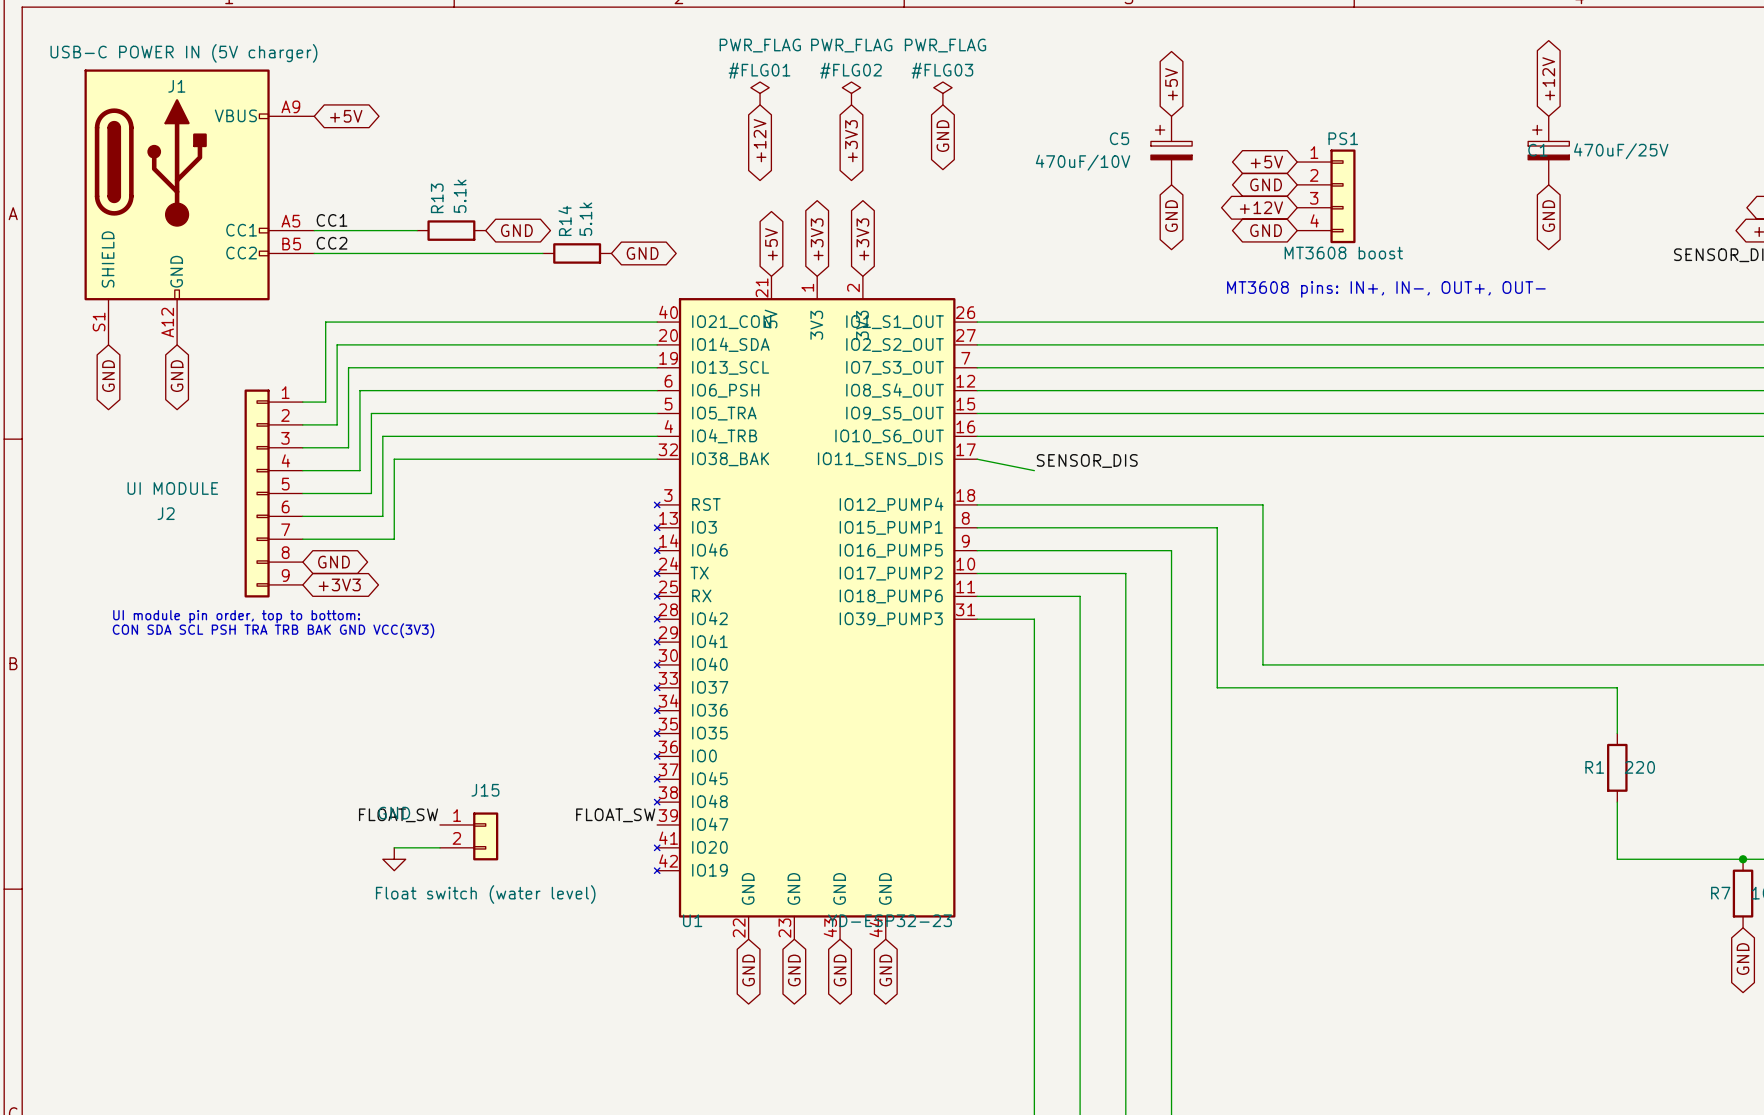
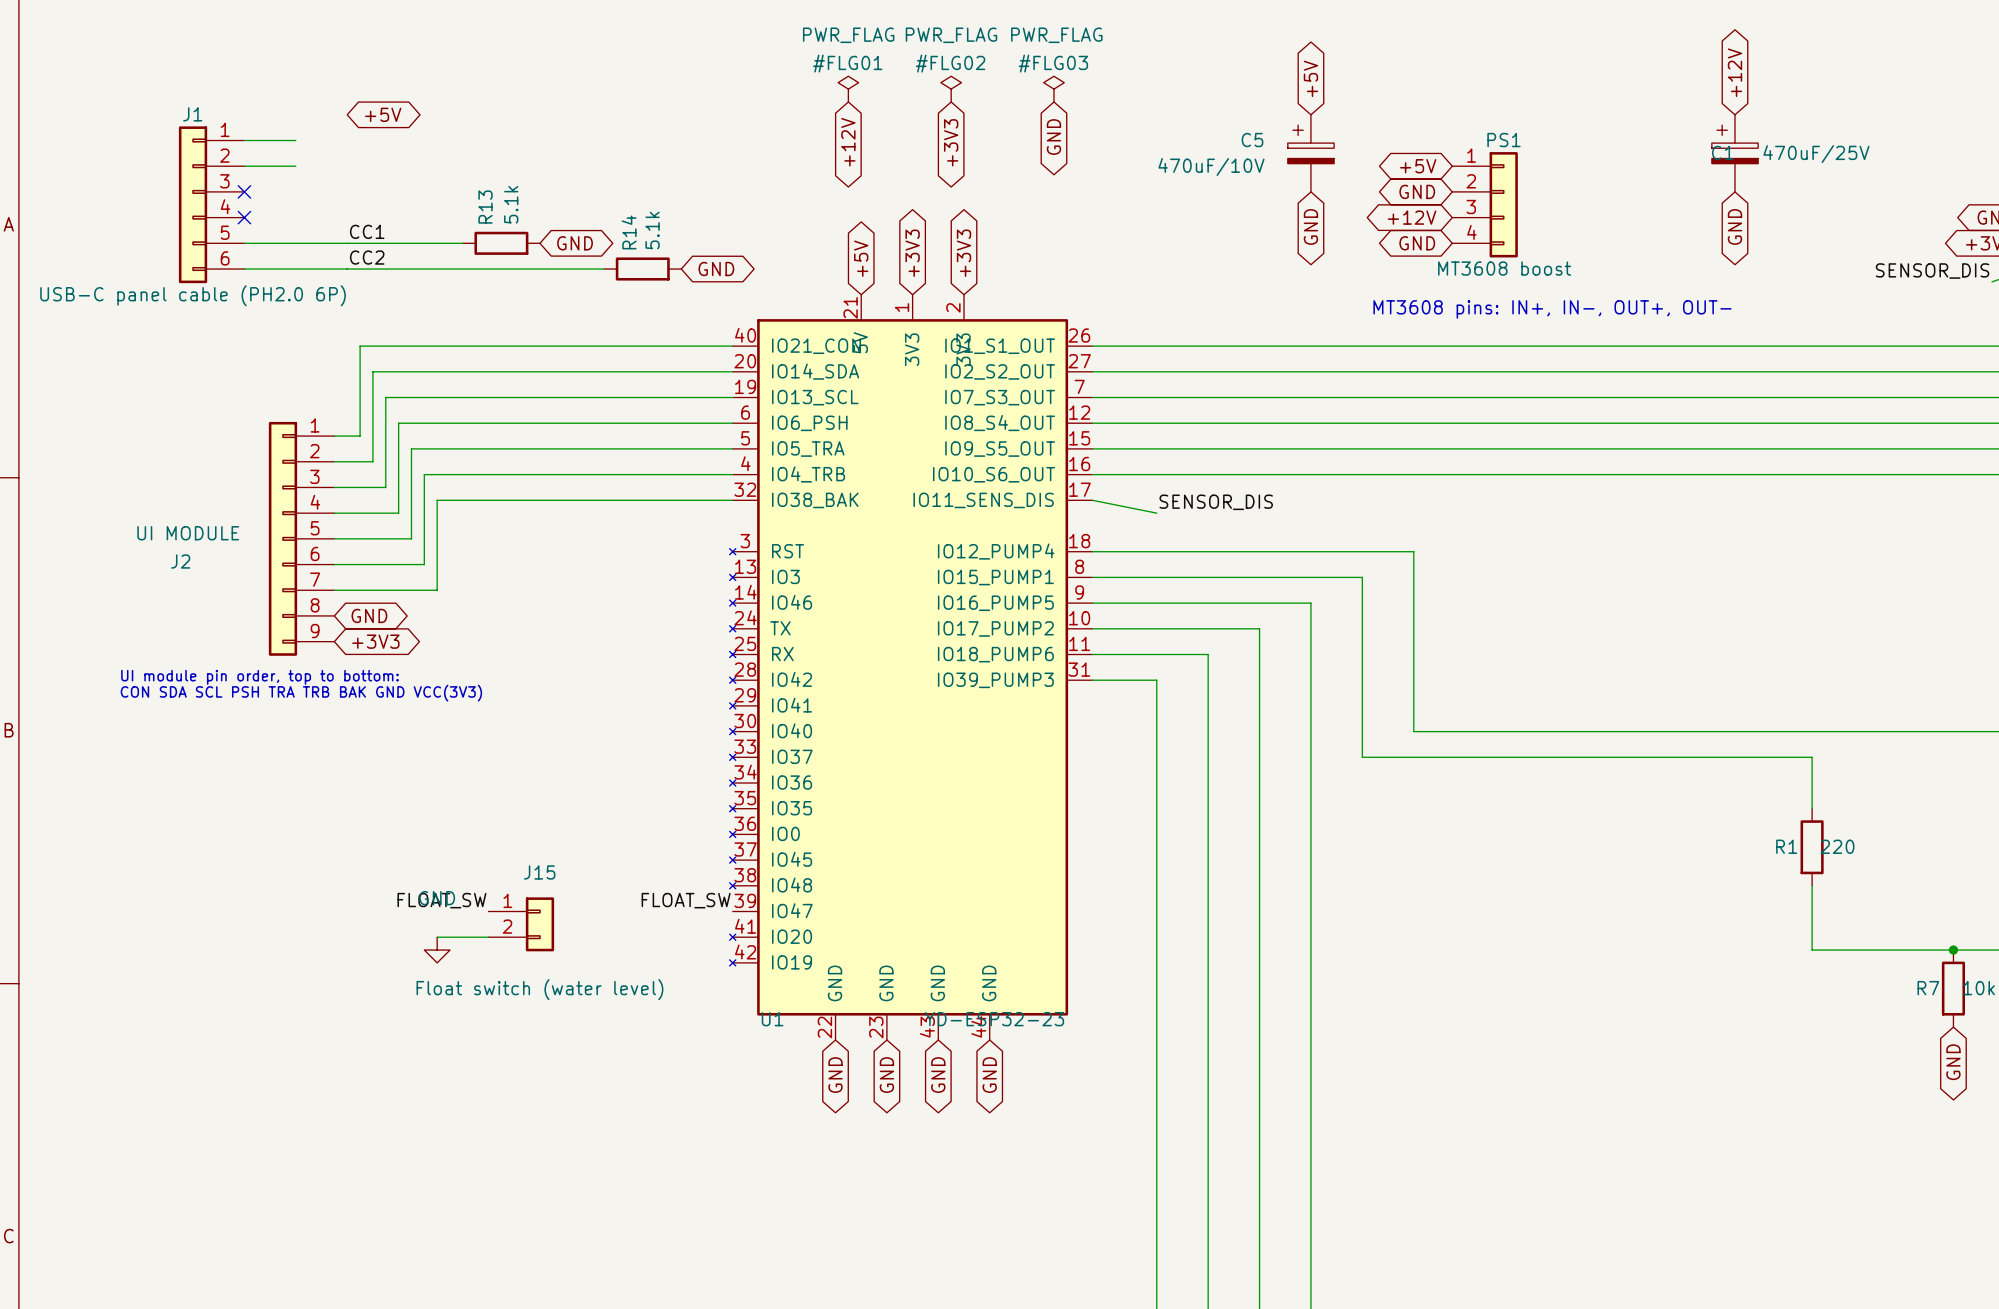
J1 value: USB-C POWER IN (5V charger) (183, 53) -> USB-C panel cable (PH2.0 6P) (193, 295)
J1 symbol: [84, 69, 315, 345] -> [178, 126, 245, 284]
J1 name position: J1 (176, 86) -> J1 (192, 114)
no-connect mark: none -> (244, 191)
no-connect mark: none -> (244, 217)
global label: GND (108, 376) -> none
global label: GND (177, 376) -> none

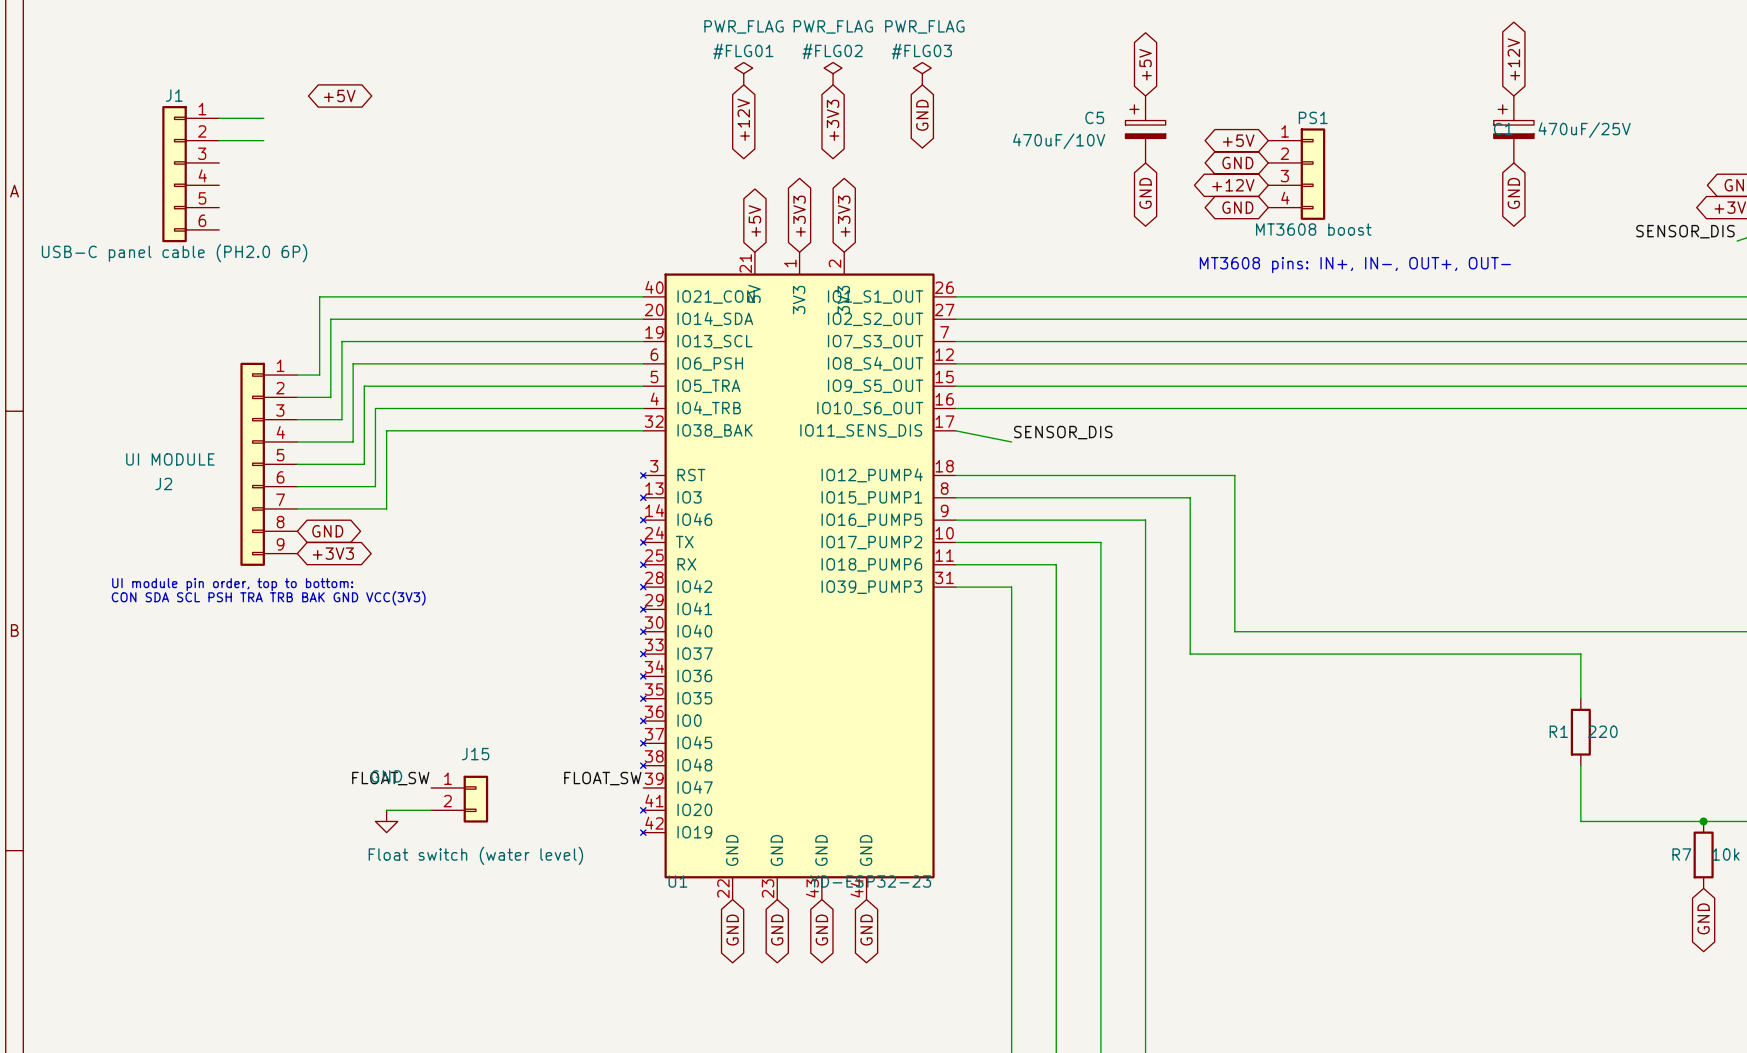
no-connect mark: (244, 191) -> none
no-connect mark: (244, 217) -> none
label: CC1 (367, 231) -> none
wire: (244, 243) (462, 243) -> none
R13: 5.1k (501, 243) -> none
global label: GND (575, 243) -> none
label: CC2 (367, 257) -> none
wire: (244, 269) (604, 269) -> none
R14: 5.1k (642, 269) -> none
global label: GND (716, 269) -> none

